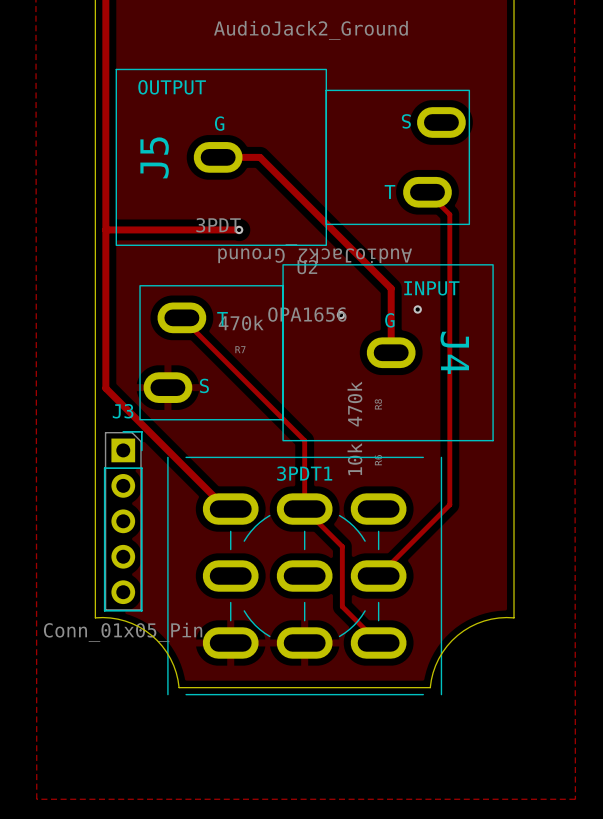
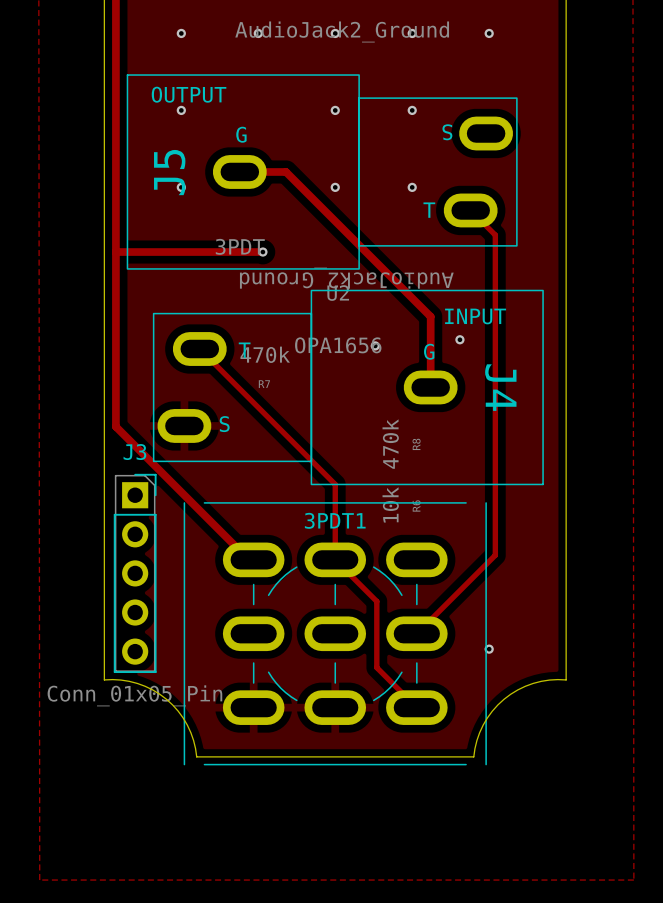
via: none -> (181, 33)
via: none -> (258, 33)
via: none -> (335, 33)
via: none -> (412, 33)
via: none -> (489, 33)
via: none -> (181, 110)
via: none -> (335, 110)
via: none -> (412, 110)
via: none -> (181, 187)
via: none -> (335, 187)
via: none -> (412, 187)
via: none -> (489, 649)

